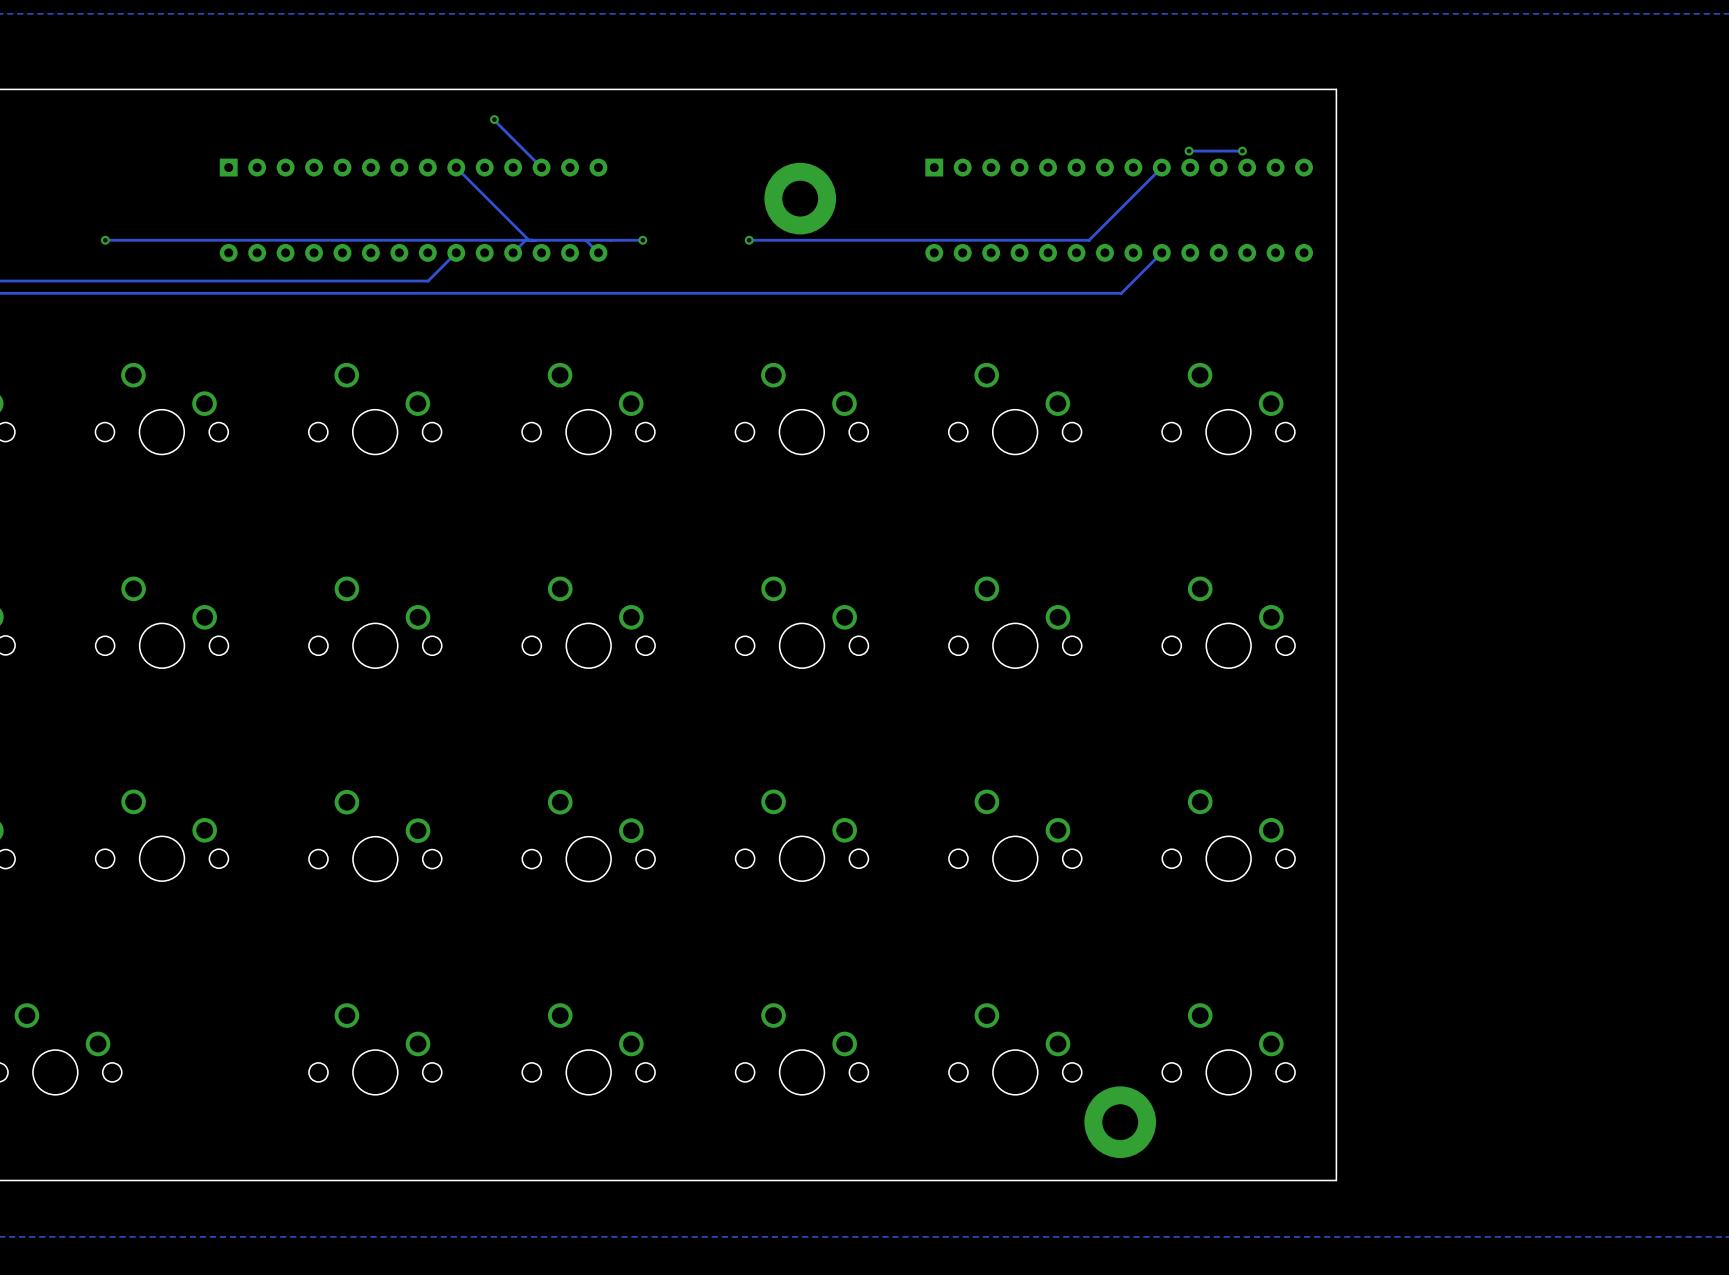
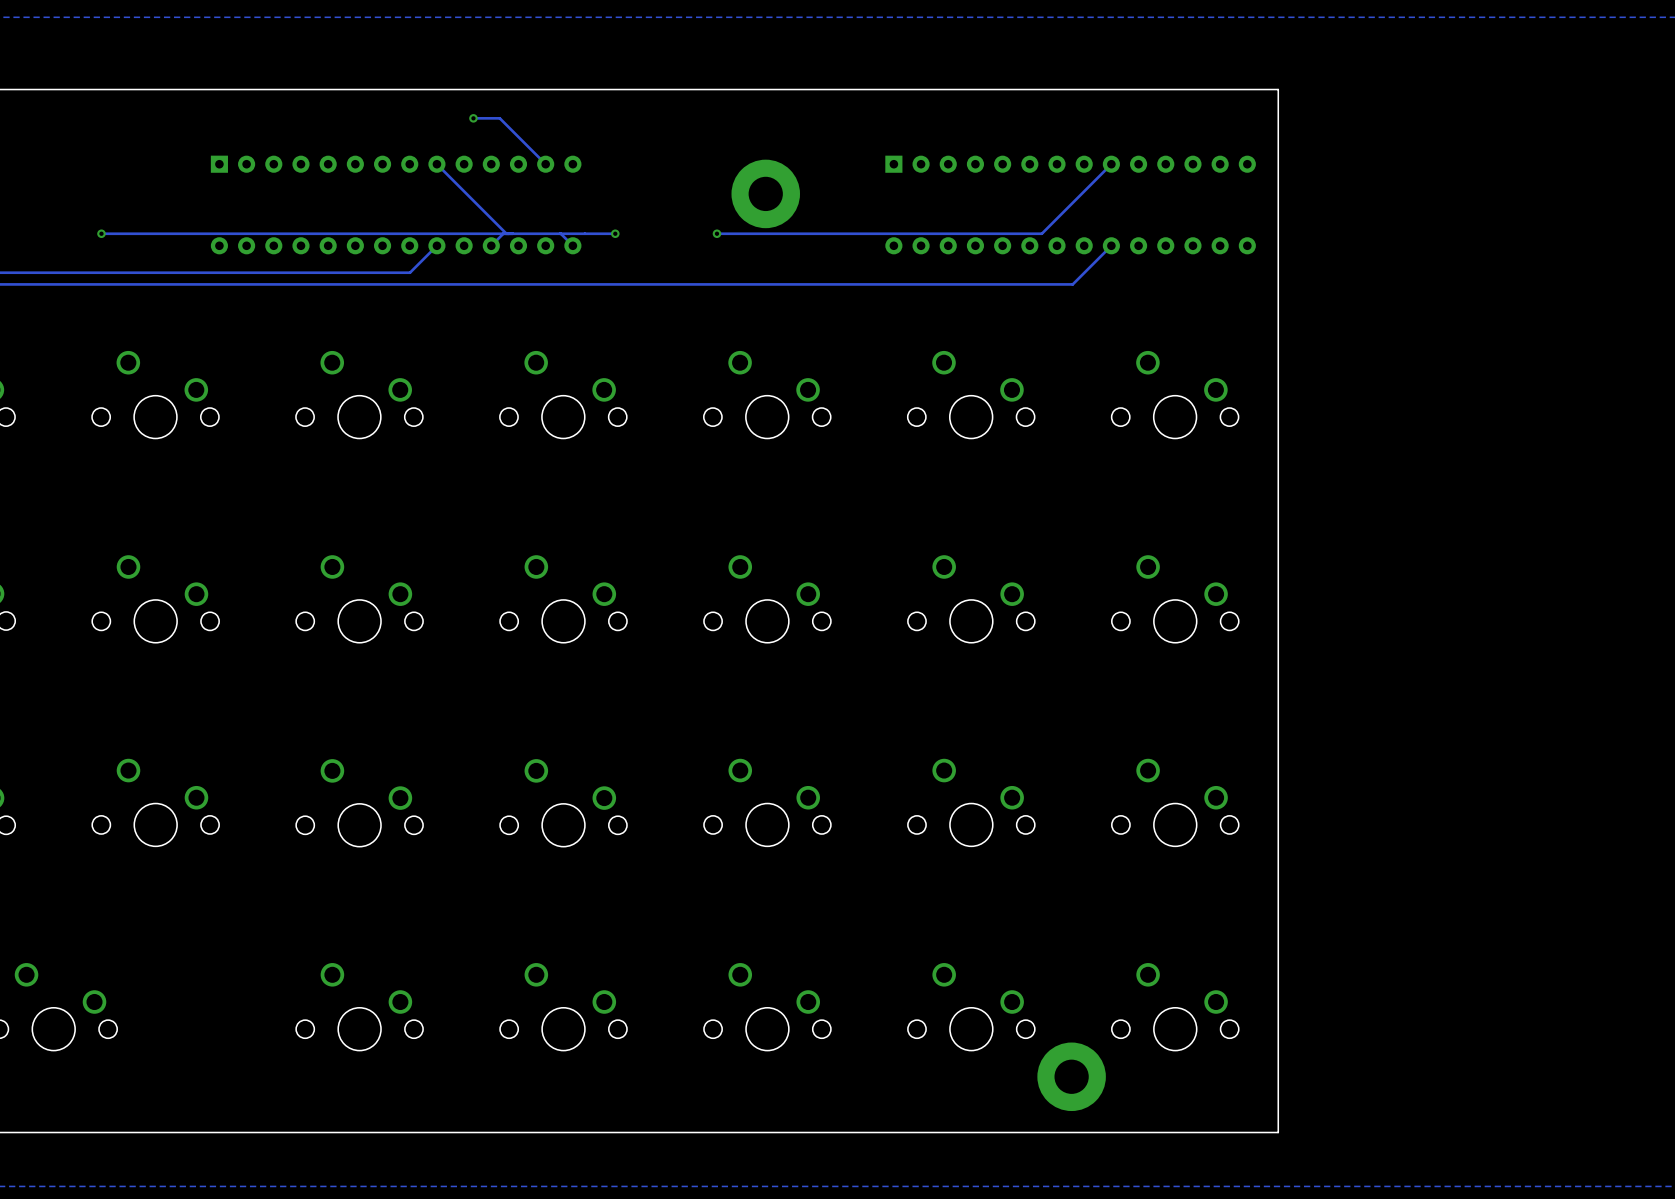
track: none -> (473, 118) (499, 118) (545, 164)
track: (494, 120) (541, 167) -> none
via: (1189, 151) -> none
track: (1242, 151) (1189, 151) -> none
via: (1242, 151) -> none

